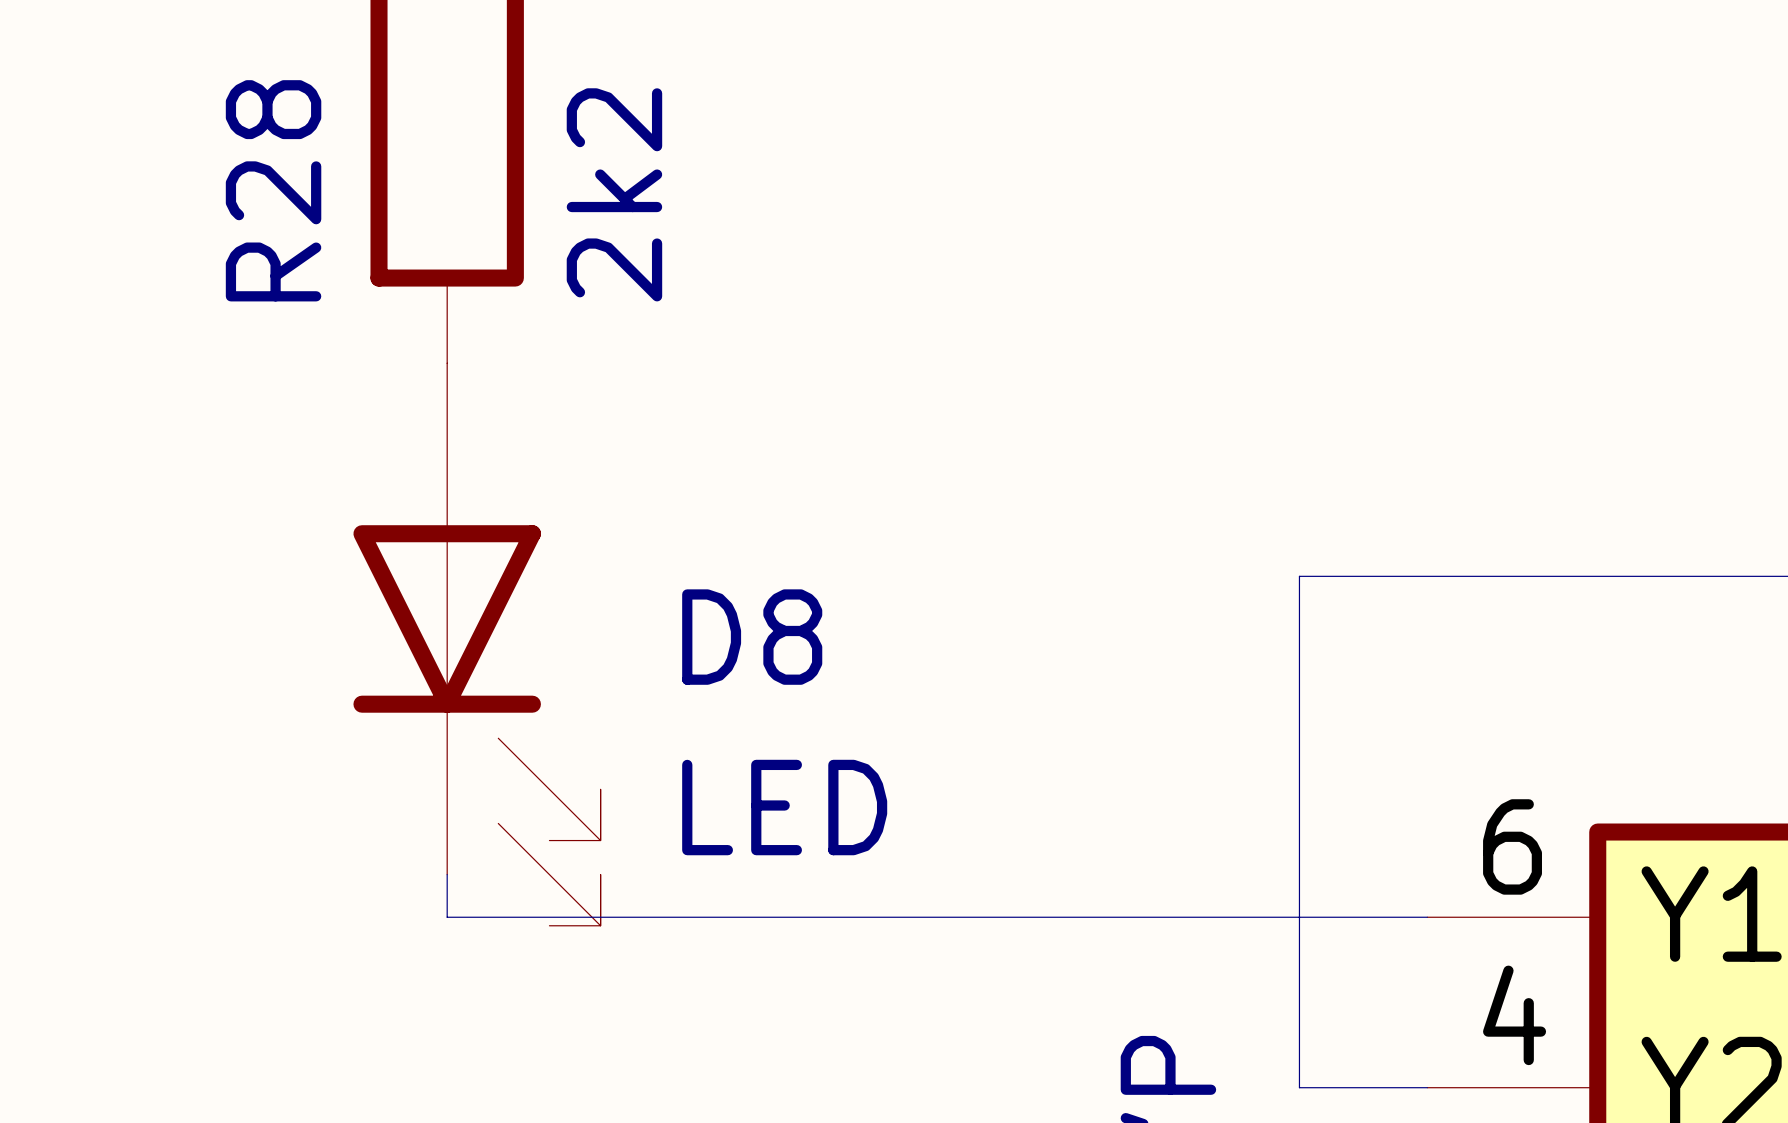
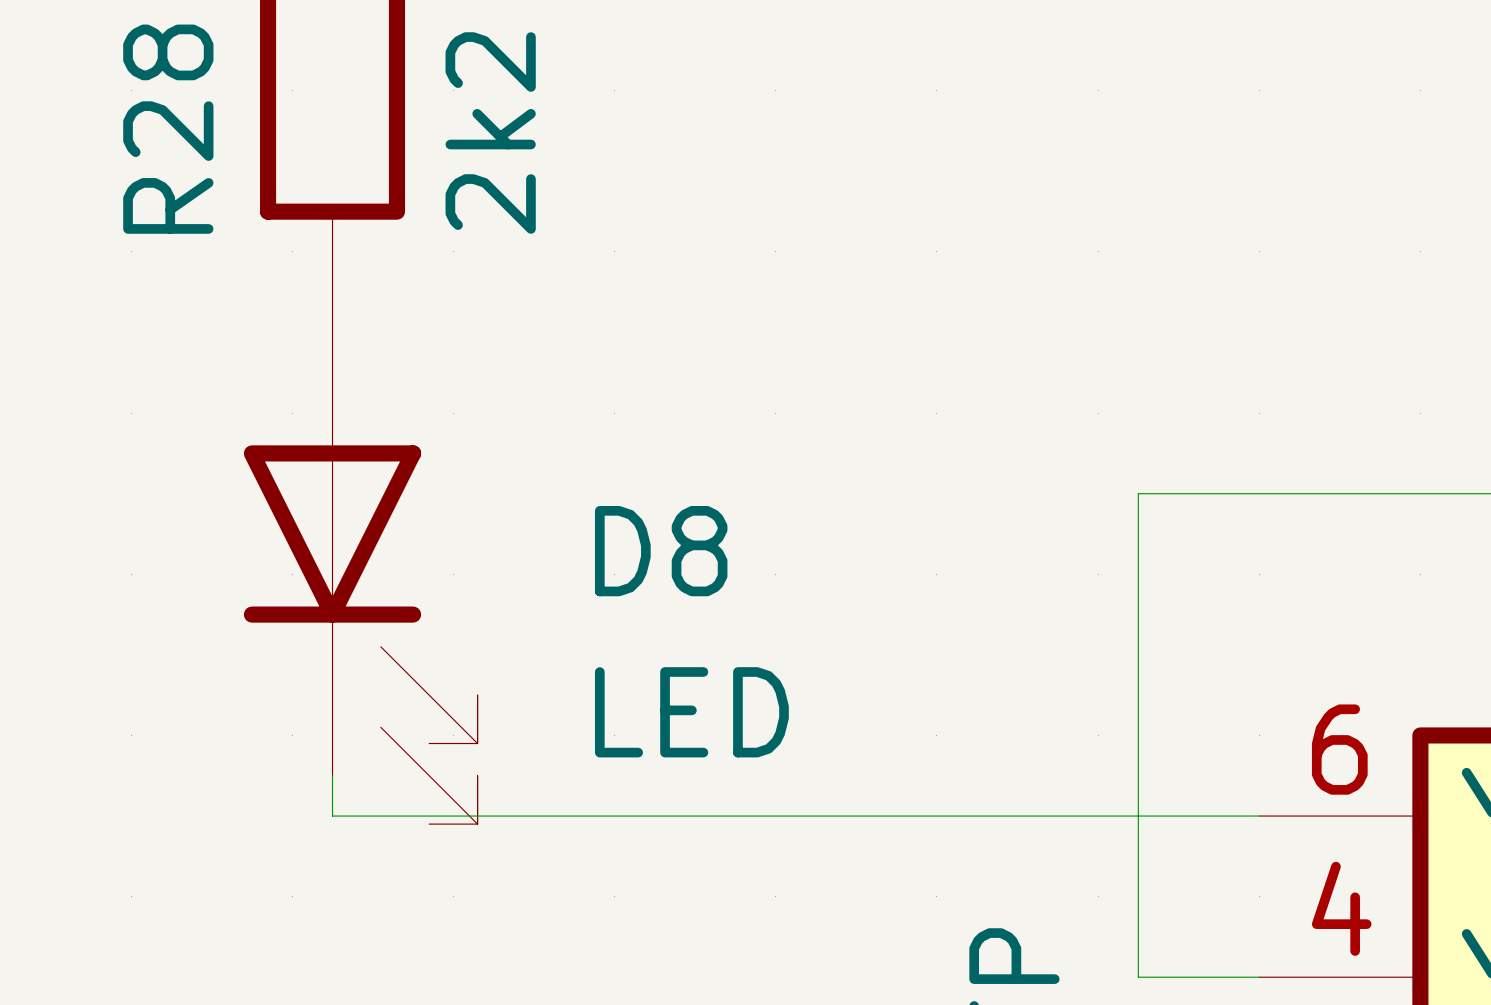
D8 name position: D8 (752, 637) -> D8 (661, 551)
D8 value position: LED (784, 807) -> LED (691, 712)

